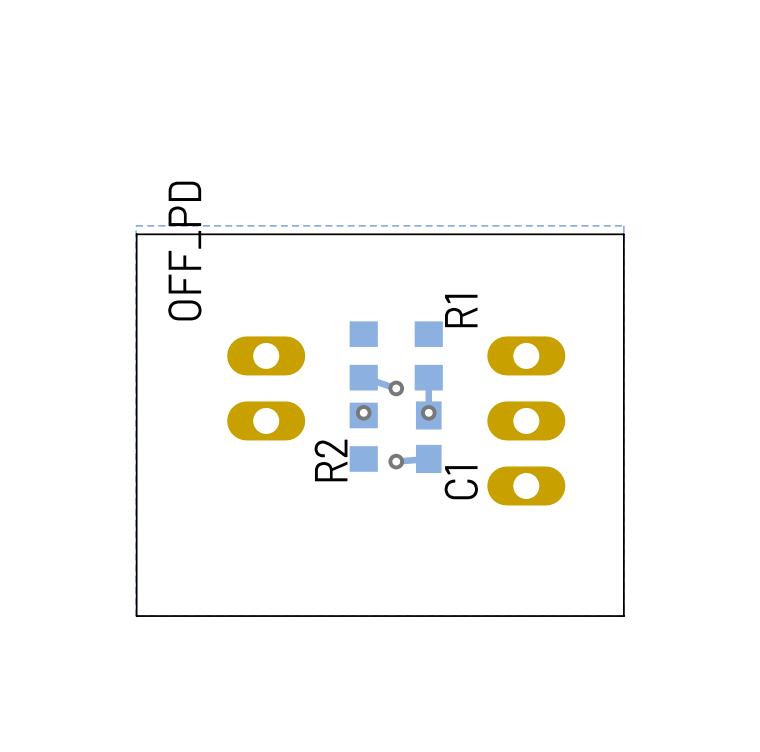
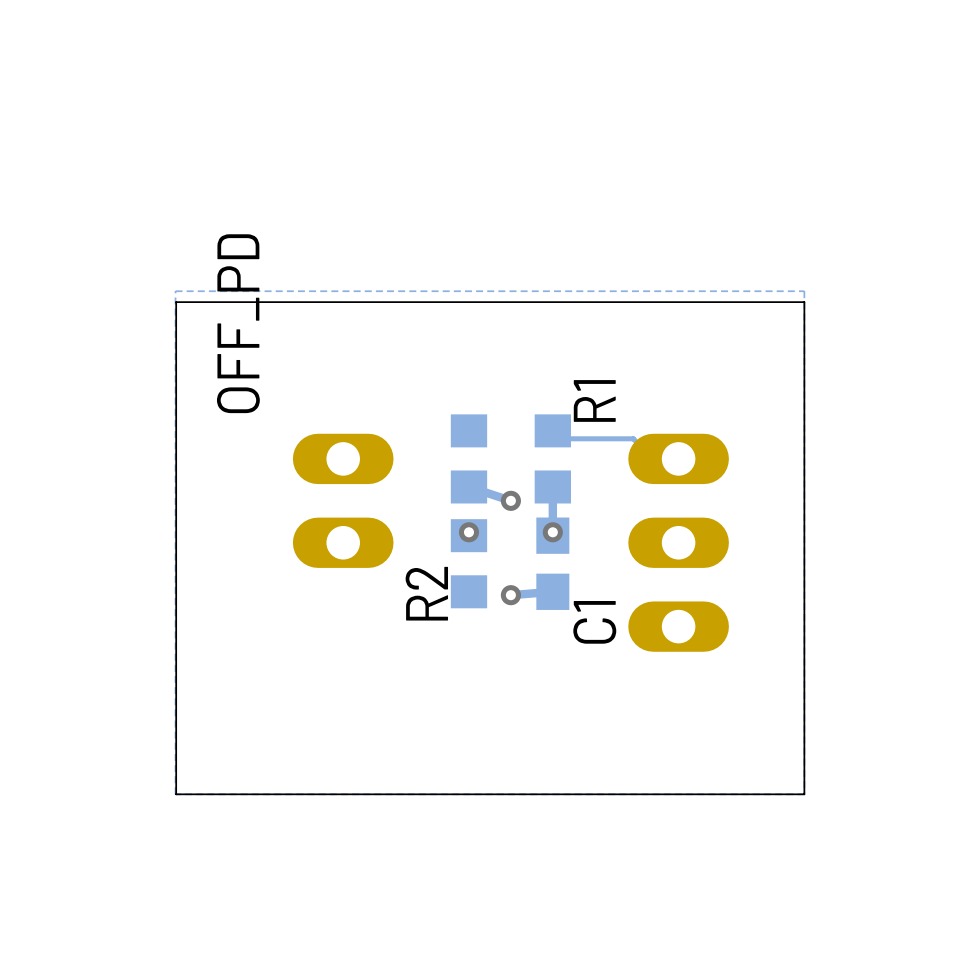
track: none -> (552, 430) (559, 438) (633, 438) (653, 458) (678, 458)

